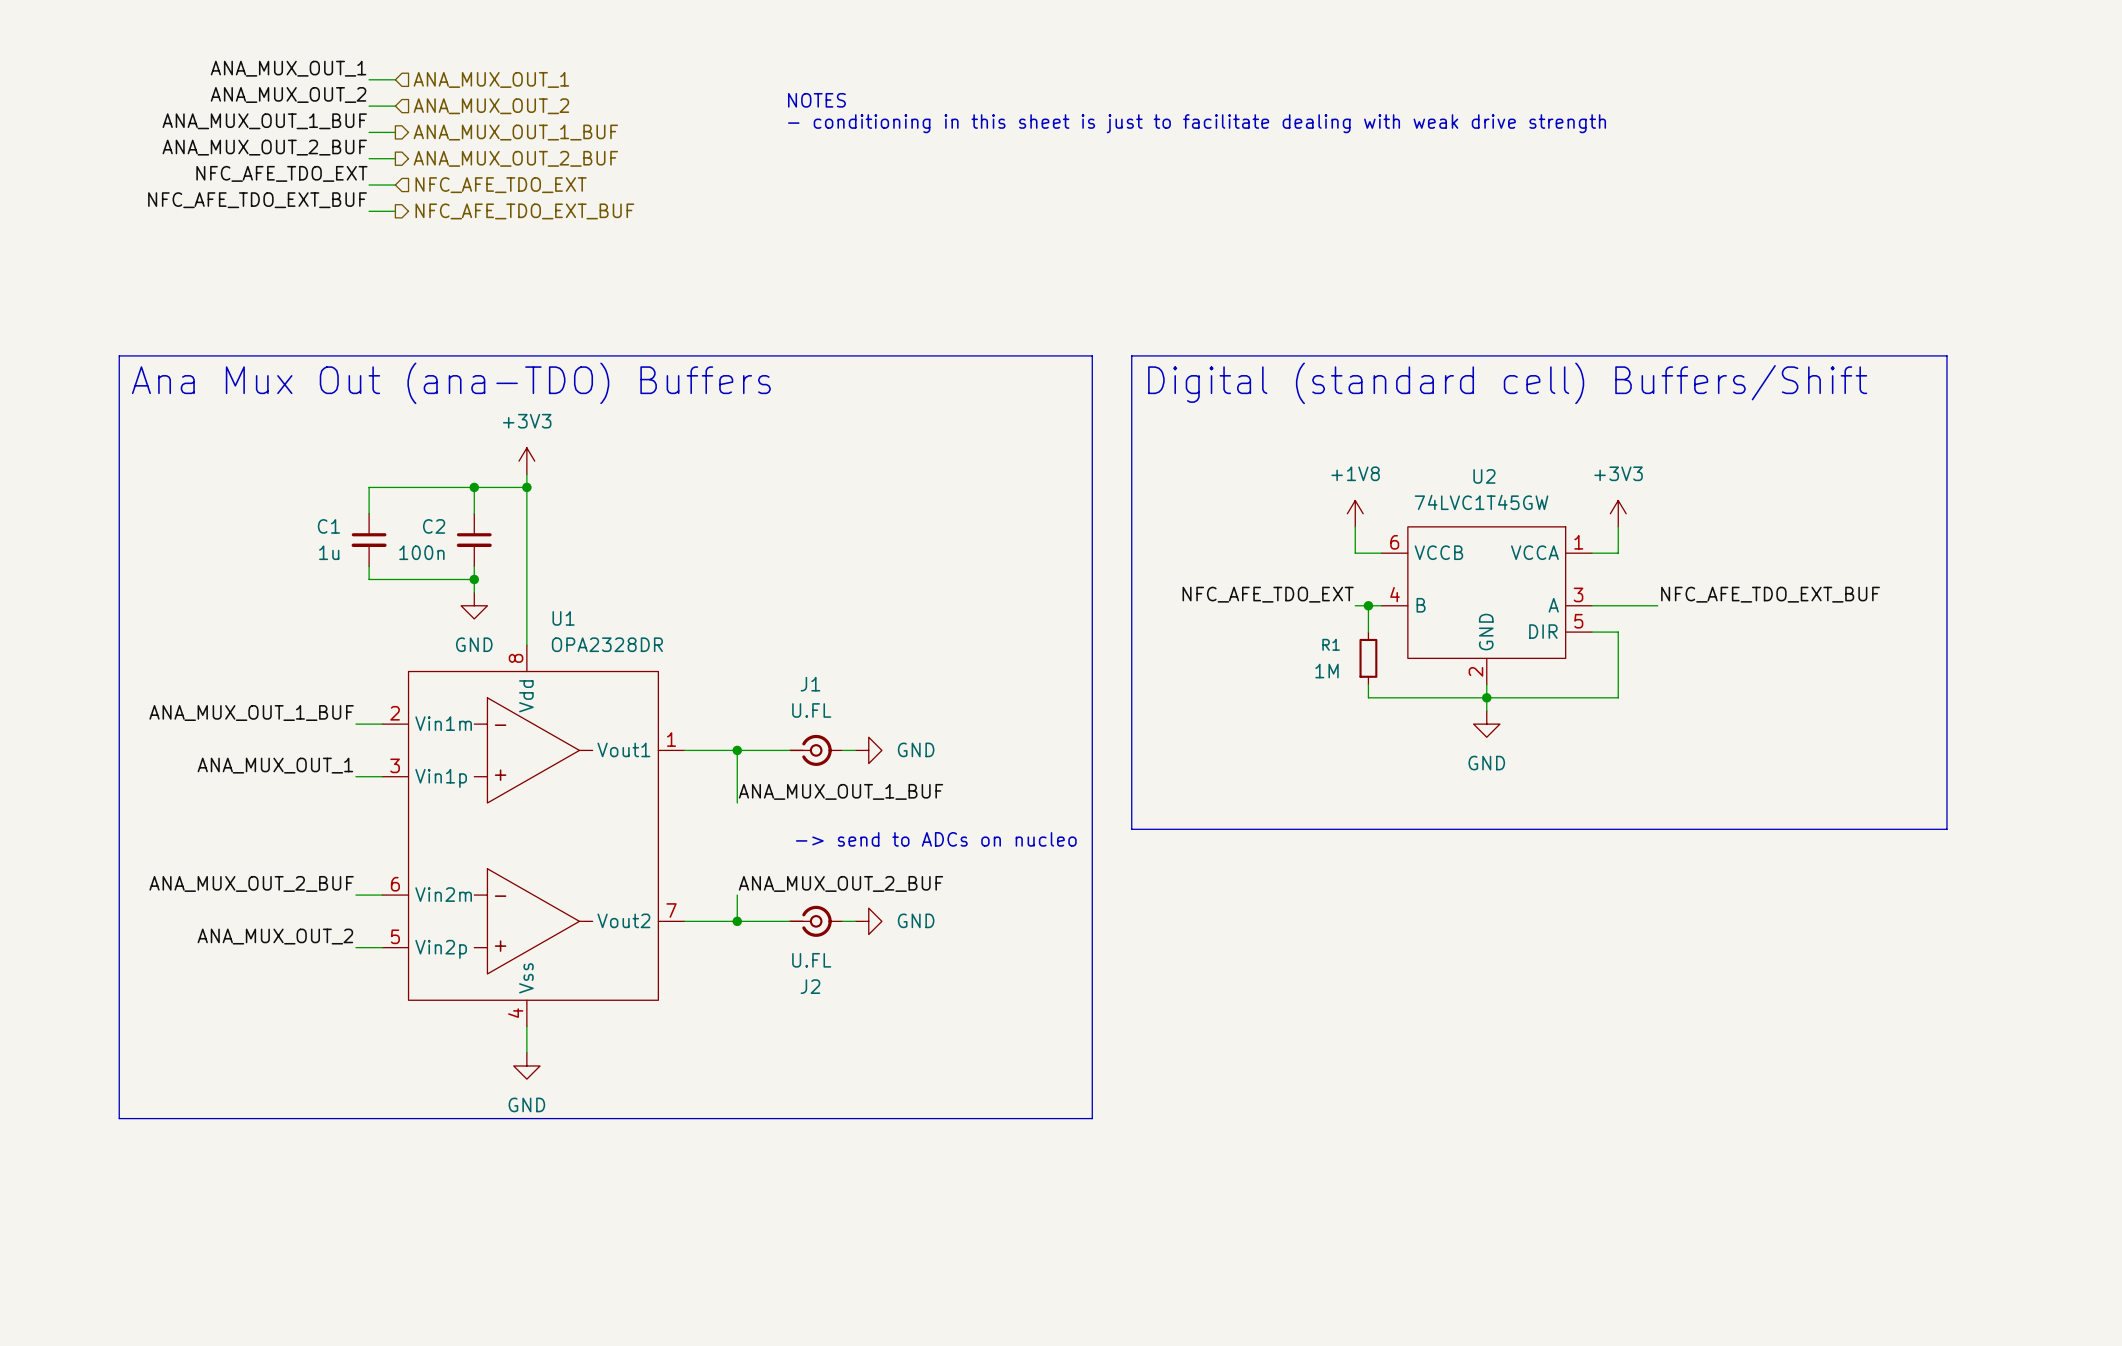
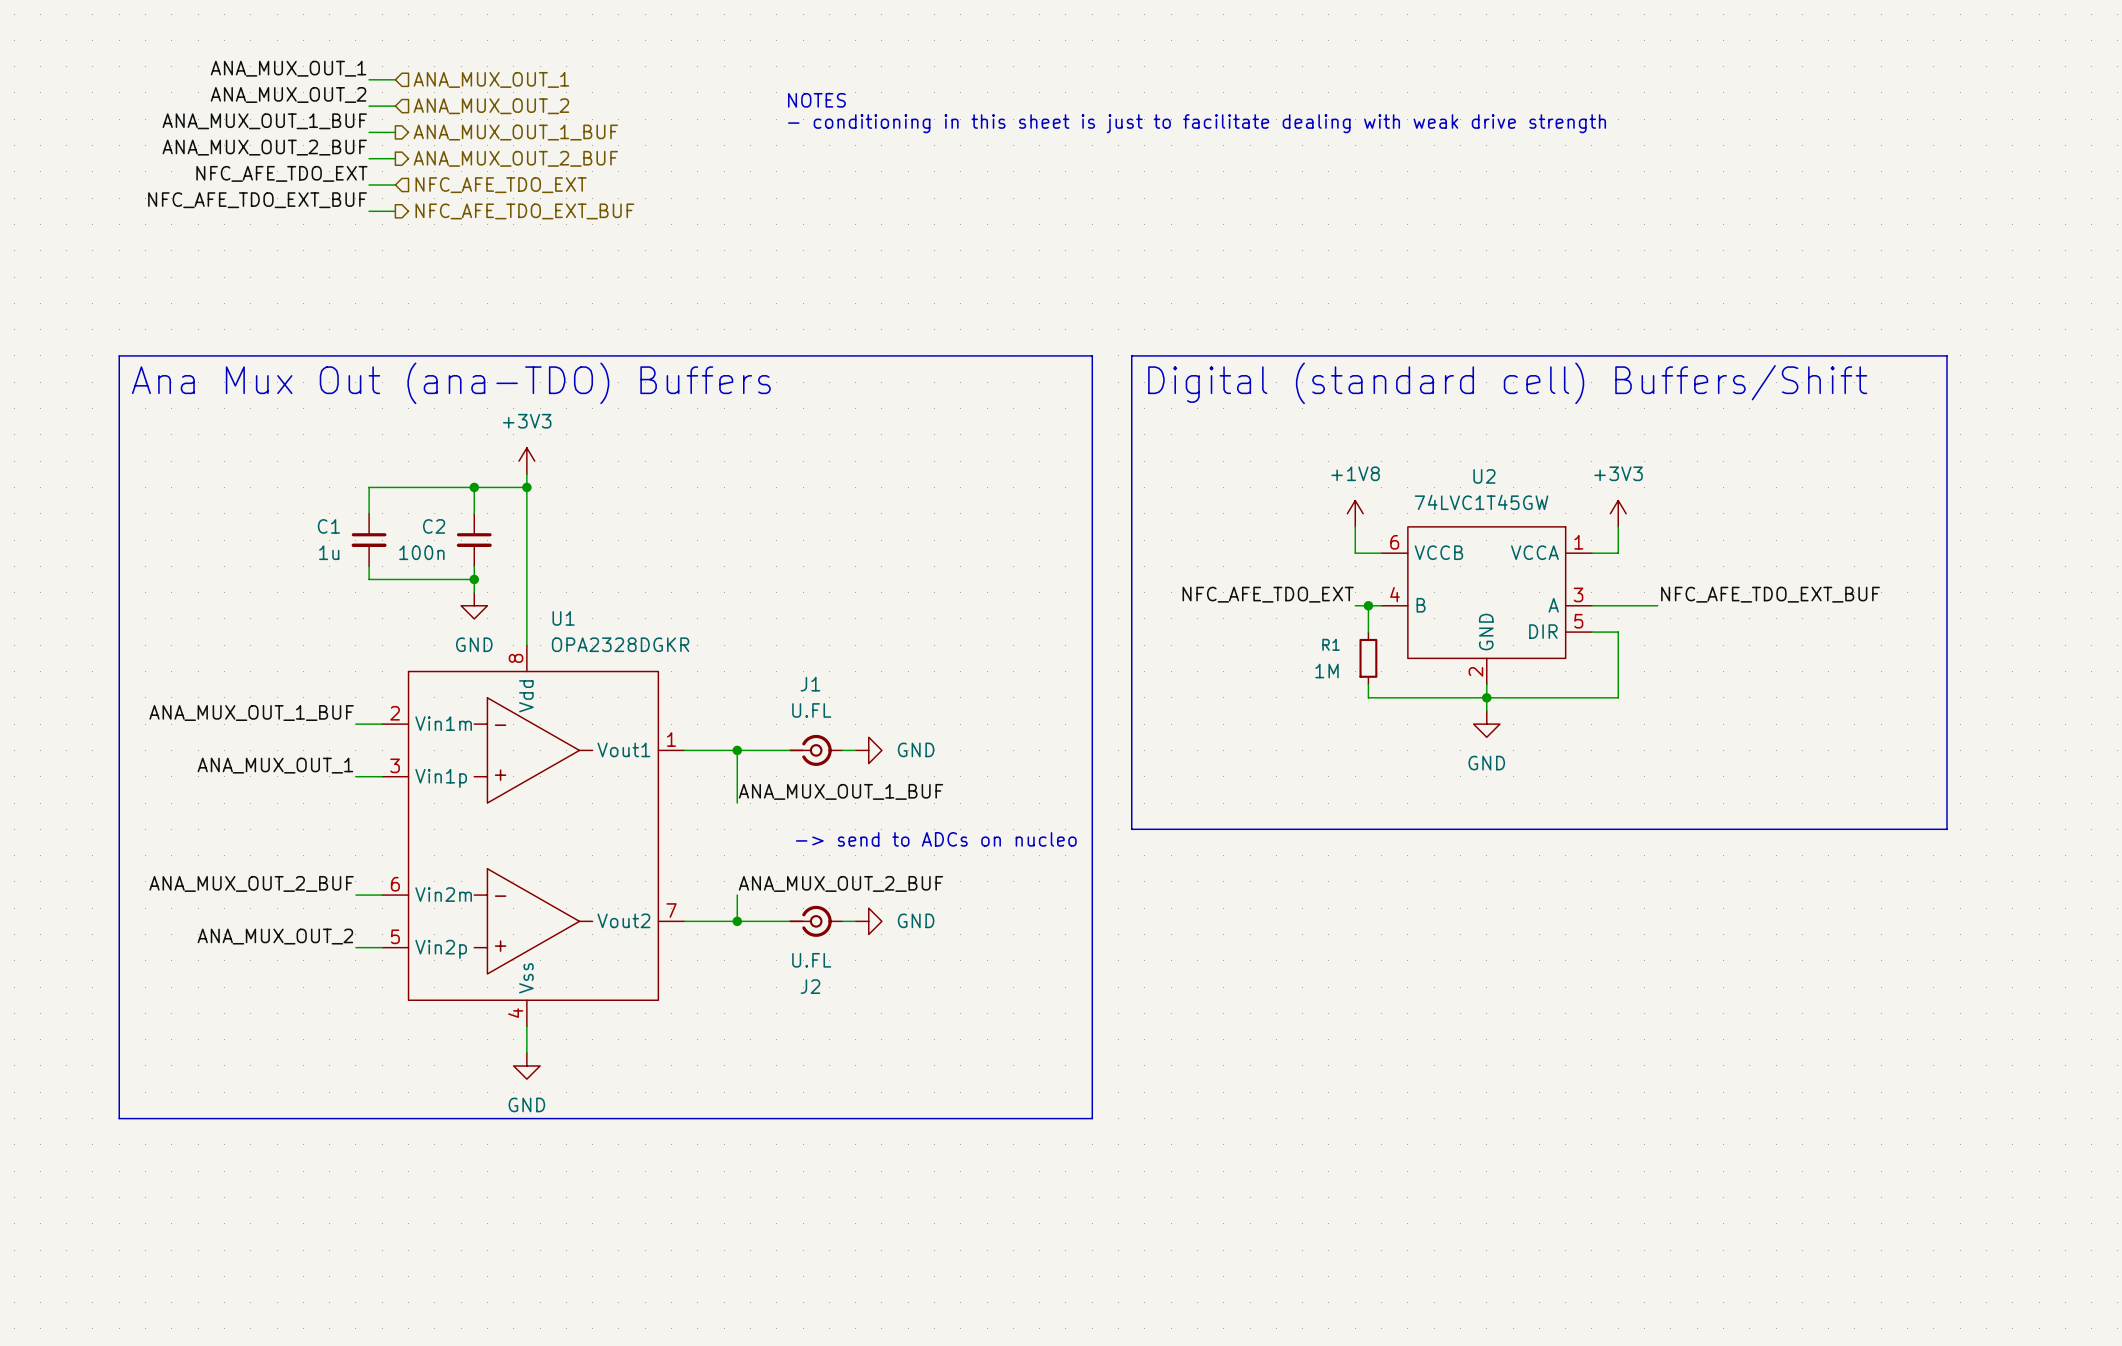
U1 value: OPA2328DR (607, 644) -> OPA2328DGKR (620, 644)

